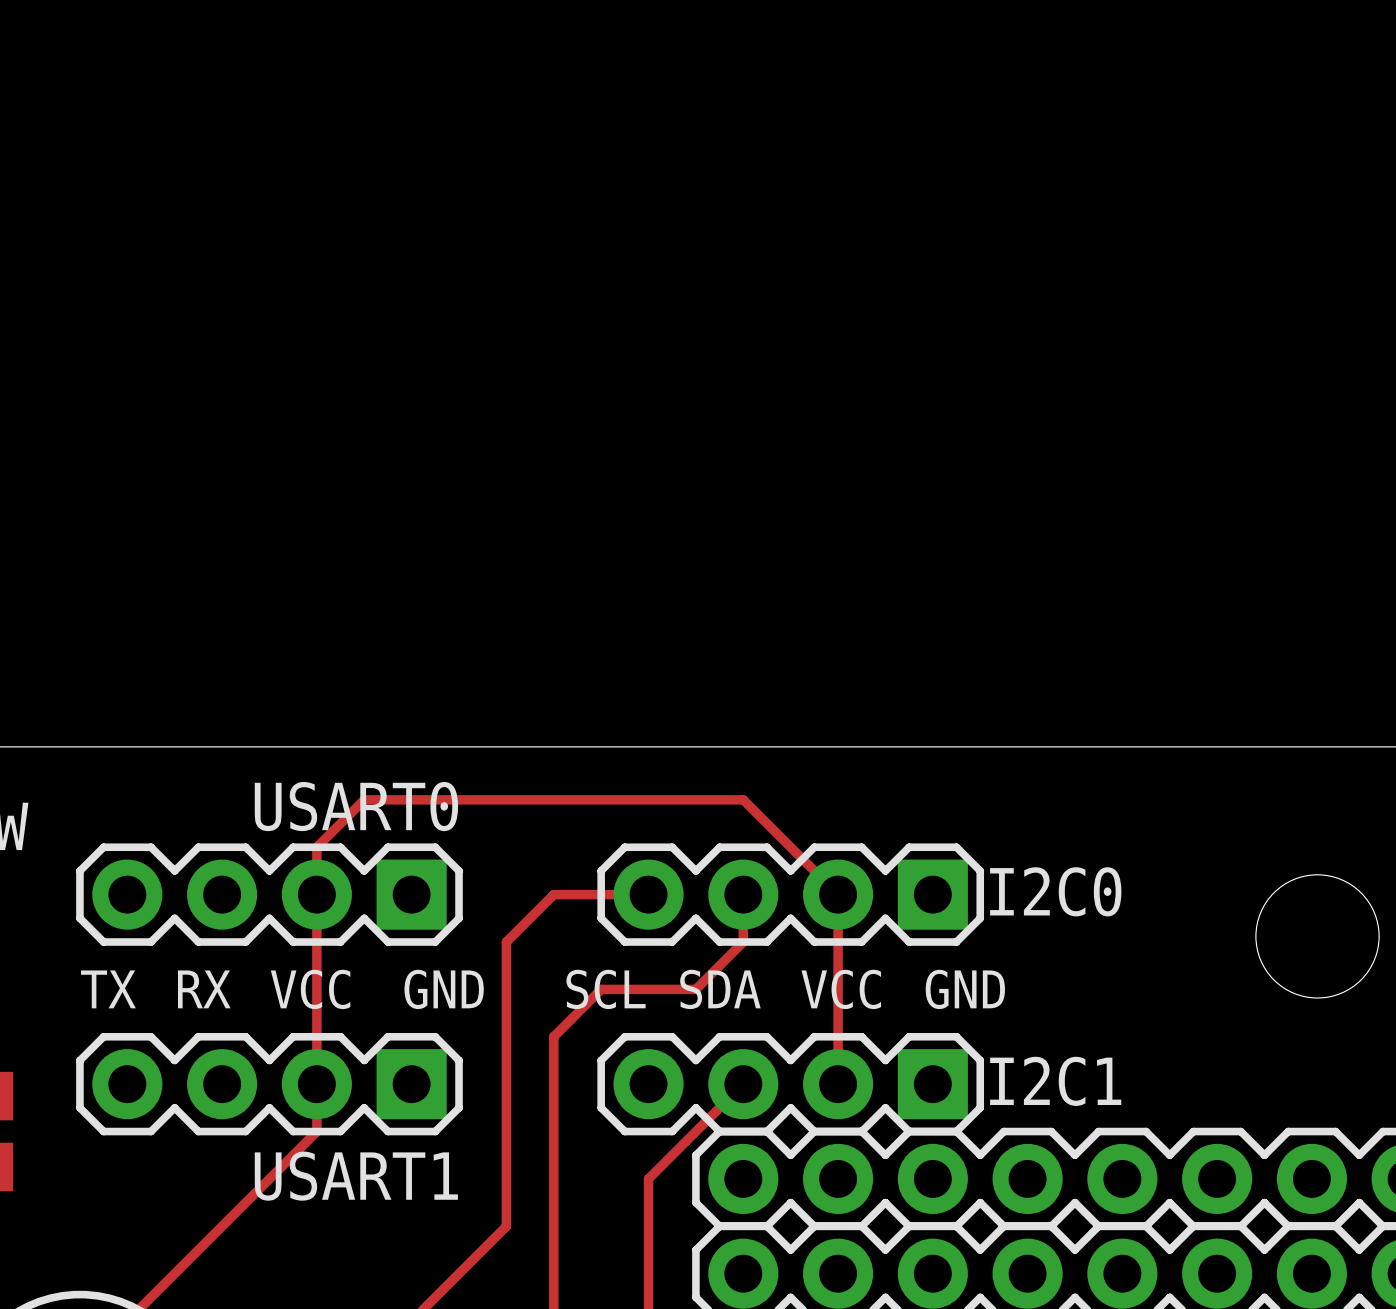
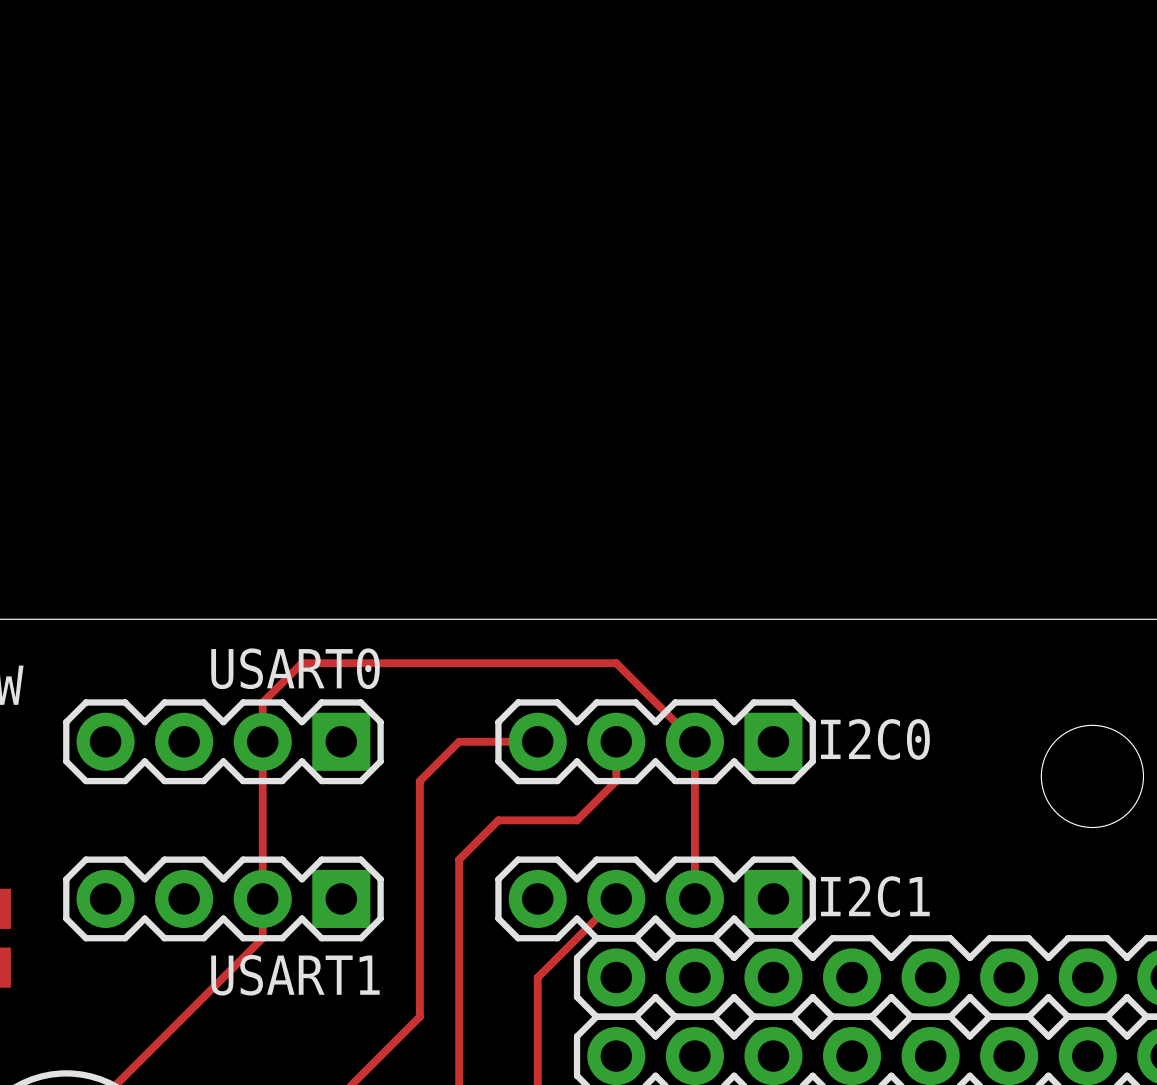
text: TX (108, 989) -> none
text: RX (204, 989) -> none
text: VCC (310, 989) -> none
text: GND (444, 989) -> none
text: SCL (606, 989) -> none
text: SDA (720, 989) -> none
text: VCC (841, 989) -> none
text: GND (965, 989) -> none

